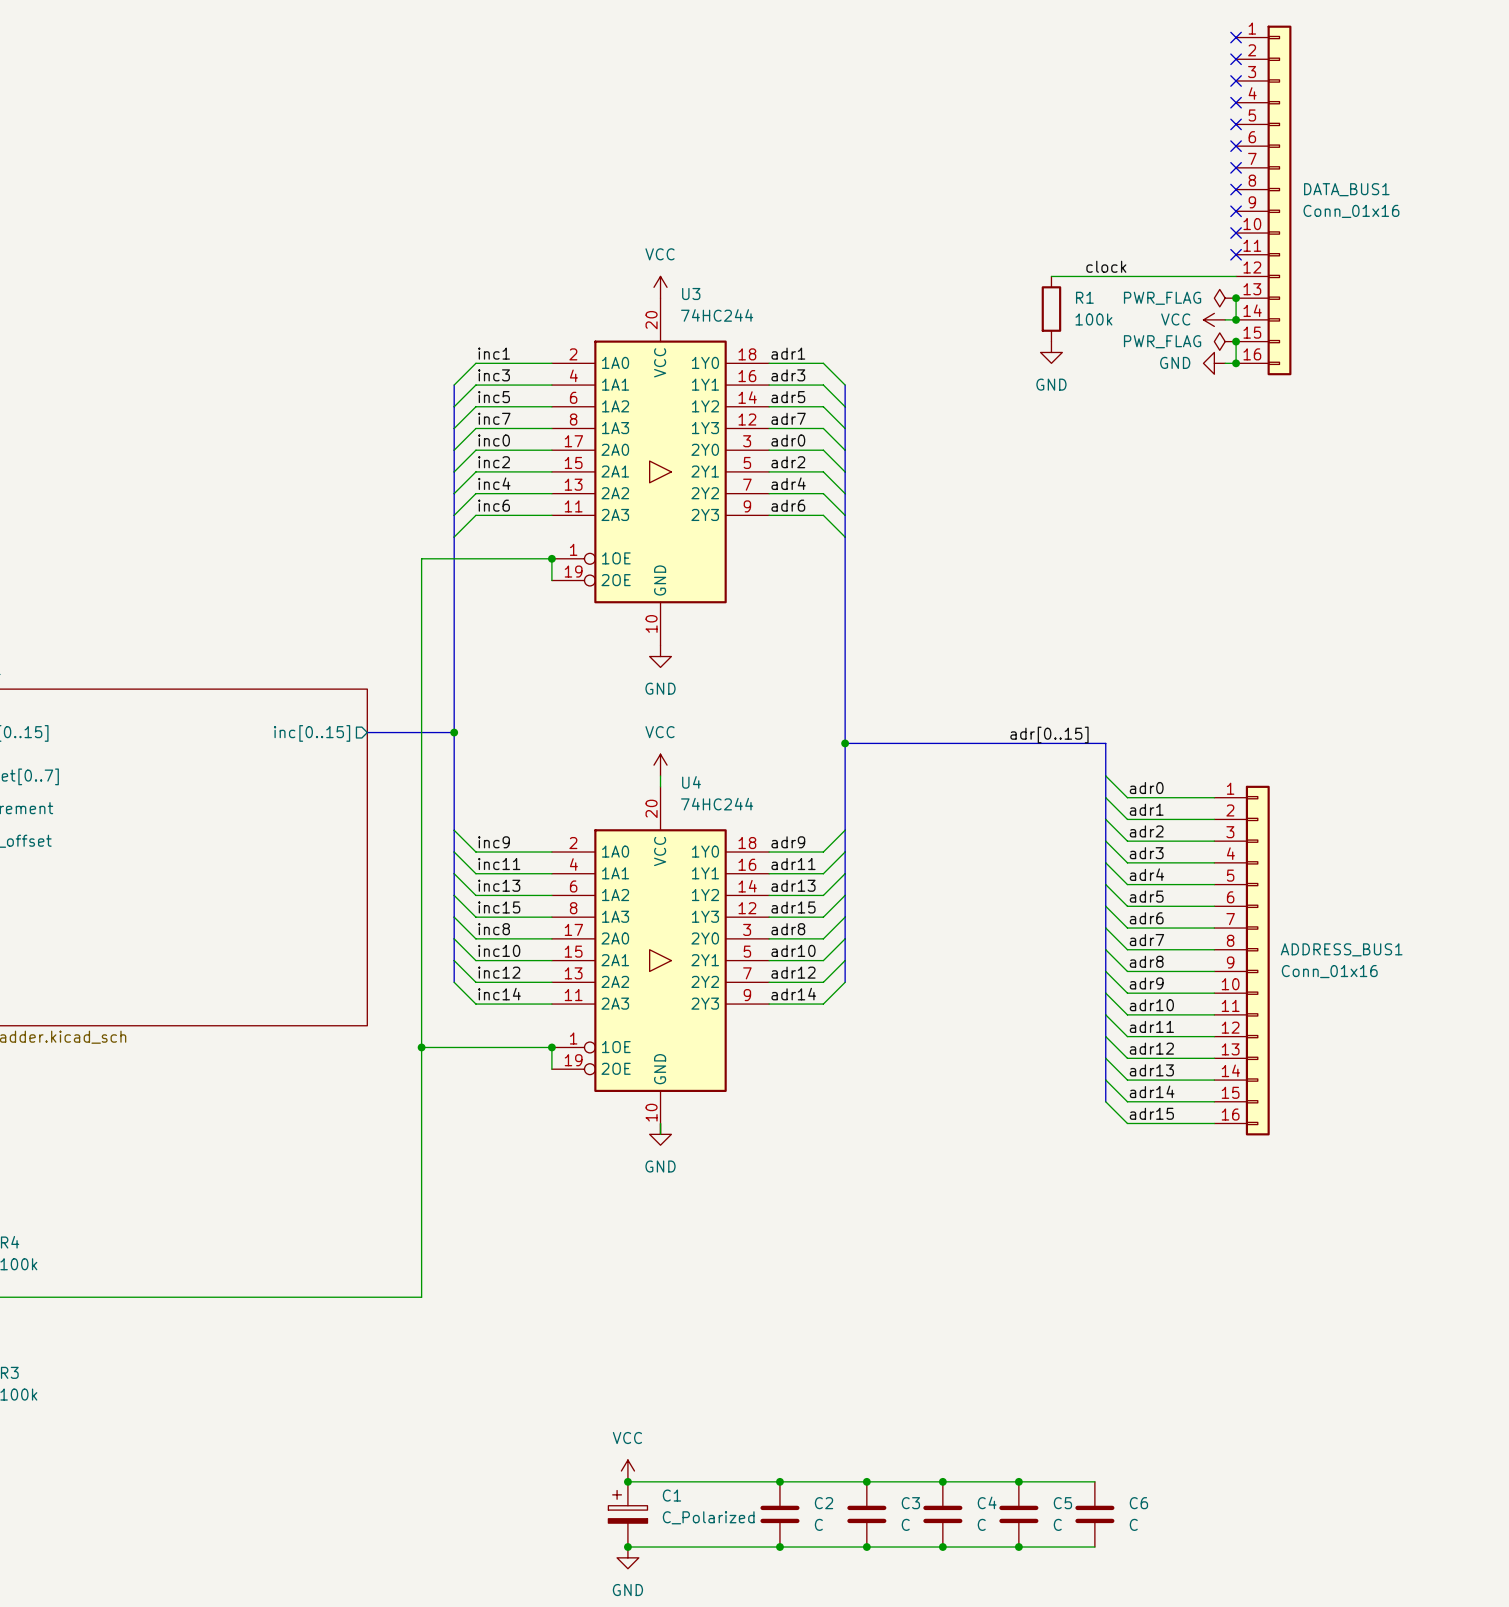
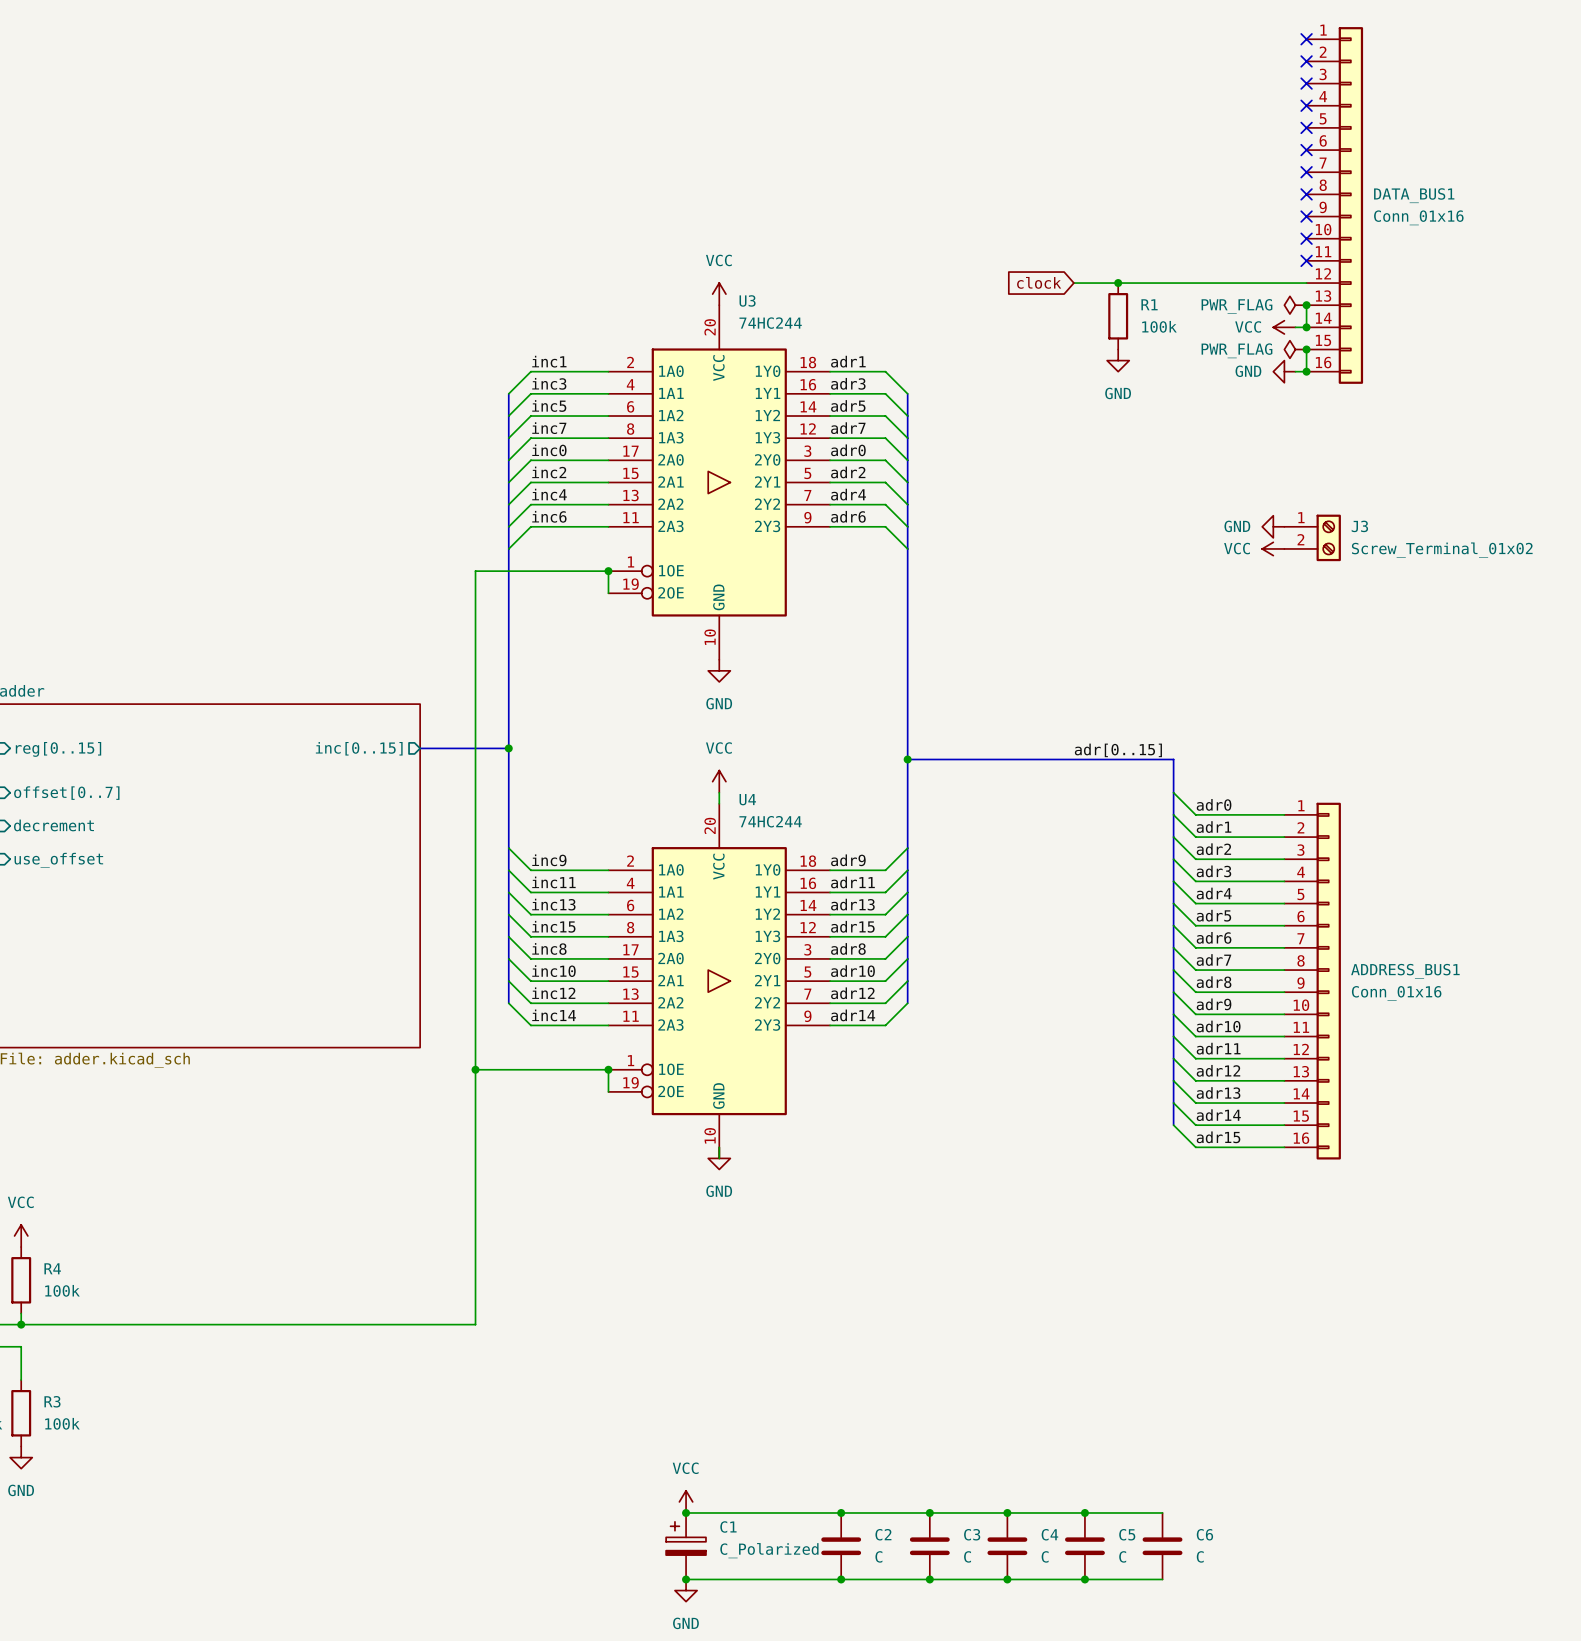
label: clock (1106, 266) -> none
global label: none -> clock (1039, 282)
wire: none -> (1073, 283) (1118, 283)
junction: none -> (1118, 283)
power symbol: none -> GND (1273, 526)
J3: none -> Screw_Terminal_01x02 (1312, 537)
power symbol: none -> VCC (1273, 548)

